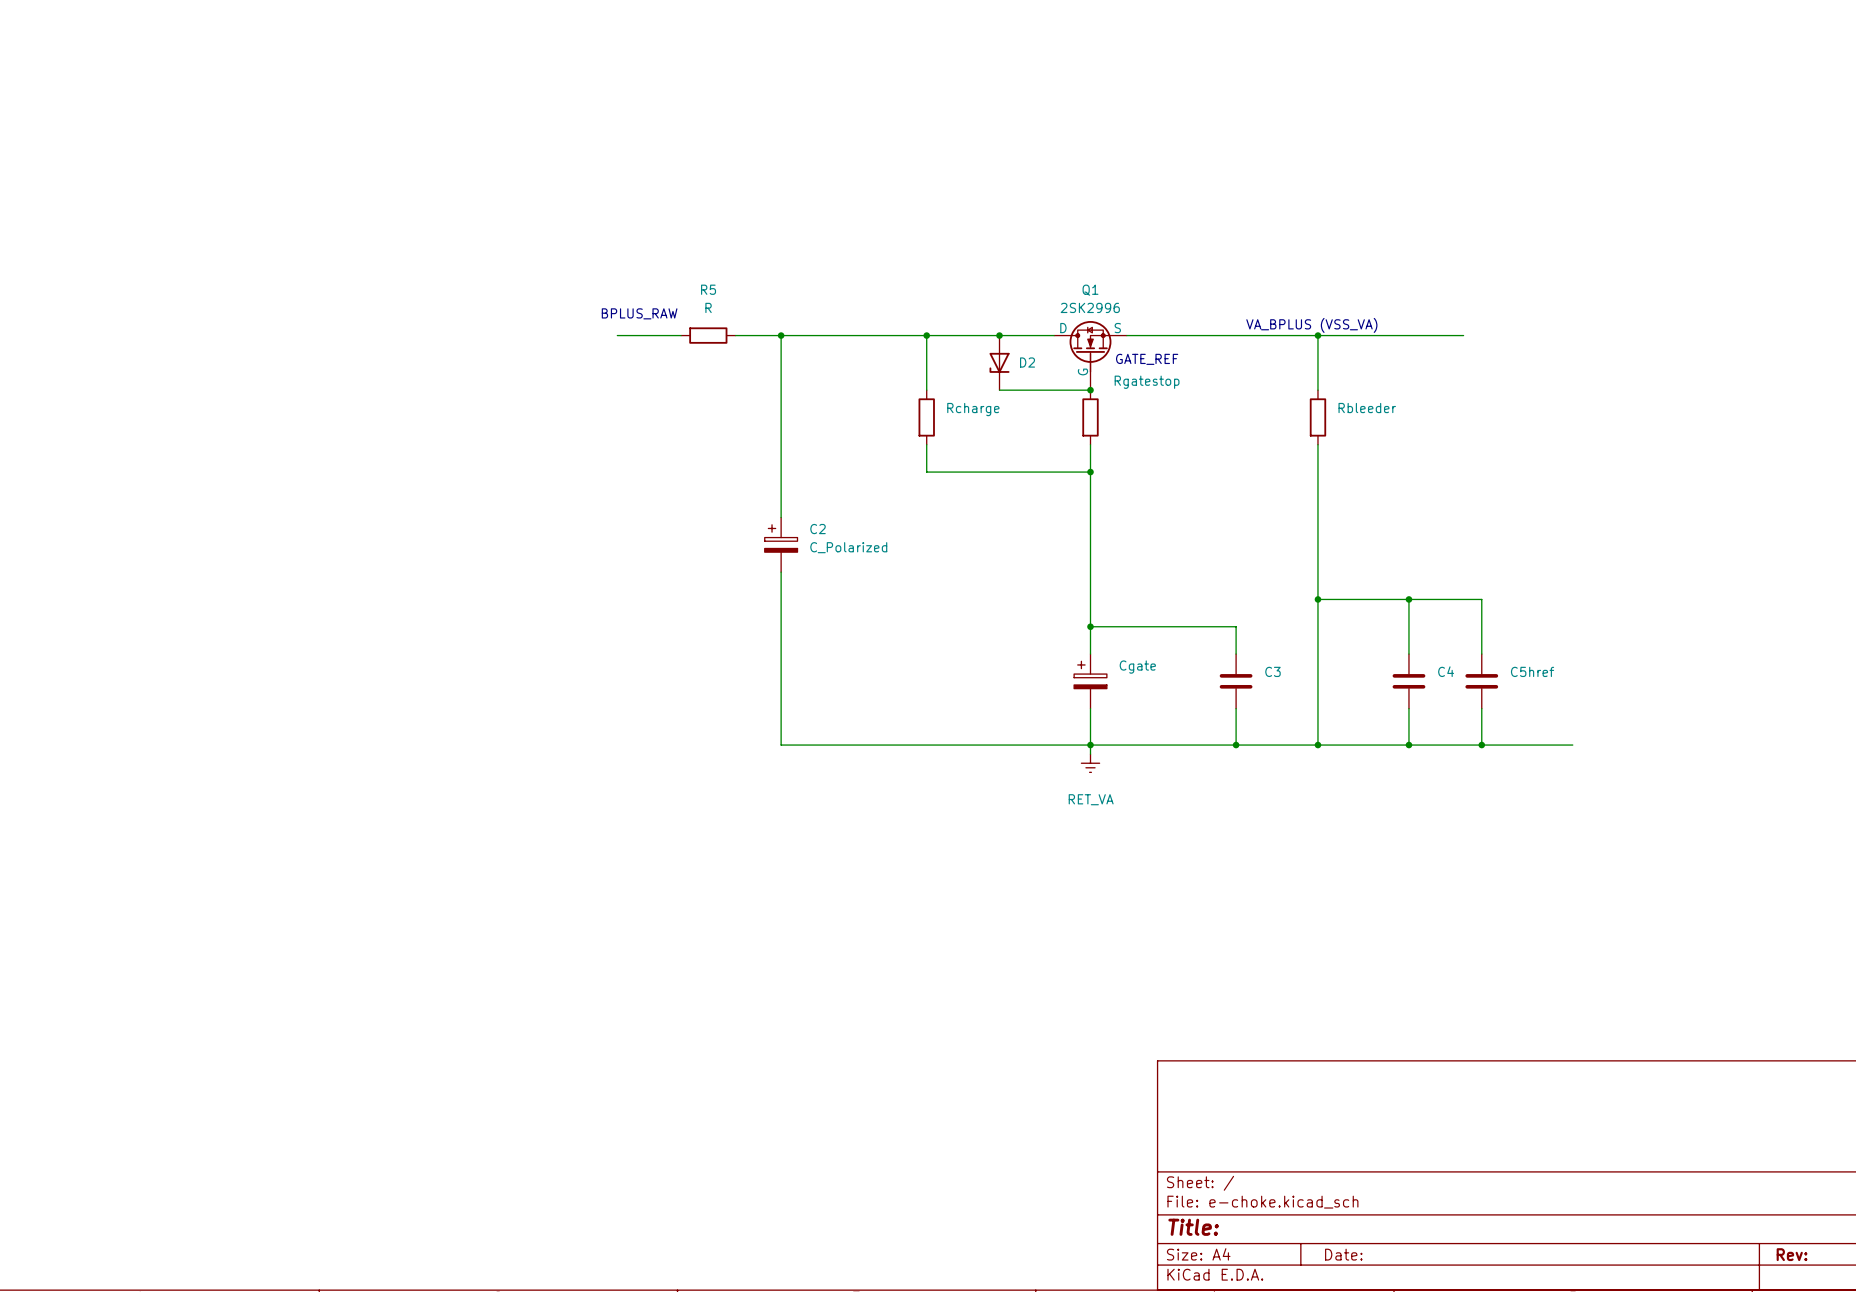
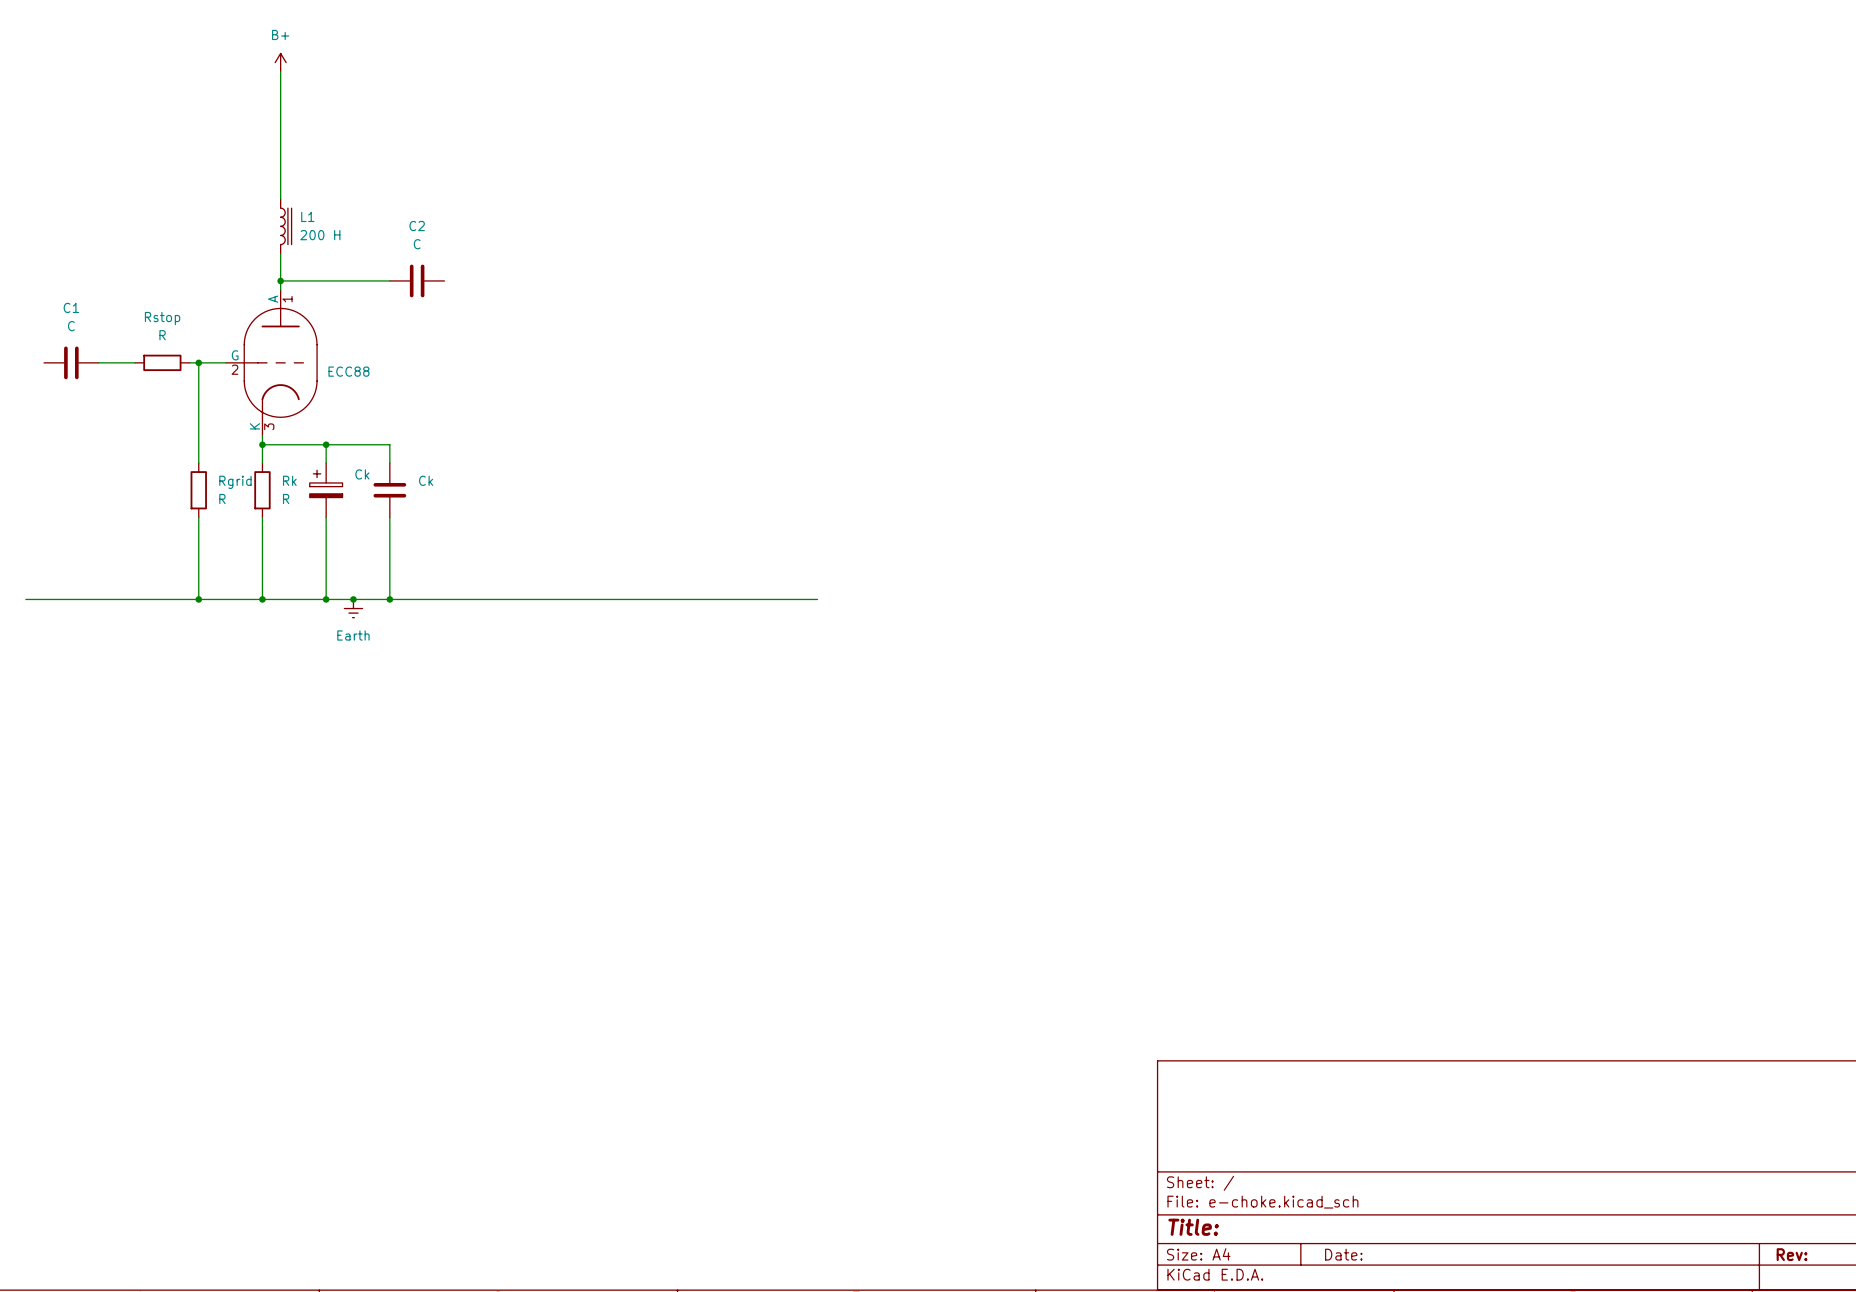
power symbol: none -> B+ (280, 62)
wire: none -> (280, 71) (280, 199)
L1: none -> 200 H (286, 226)
wire: none -> (280, 253) (280, 290)
wire: none -> (280, 280) (389, 280)
junction: none -> (280, 280)
text: BPLUS_RAW (639, 313) -> none
text: VA_BPLUS (VSS_VA) (1311, 325) -> none
wire: (617, 335) (681, 335) -> none
R5: R (708, 335) -> none
wire: (735, 335) (1054, 335) -> none
wire: (781, 335) (781, 517) -> none
junction: (781, 335) -> none
wire: (926, 335) (926, 390) -> none
junction: (926, 335) -> none
junction: (999, 335) -> none
wire: (1126, 335) (1463, 335) -> none
wire: (1317, 335) (1317, 390) -> none
junction: (1317, 335) -> none
Q1: 2SK2996 (1090, 355) -> none
text: GATE_REF (1147, 359) -> none
C1: none -> C (71, 362)
wire: none -> (98, 362) (135, 362)
Rstop: none -> R (162, 362)
wire: none -> (189, 362) (226, 362)
wire: none -> (198, 362) (198, 462)
junction: none -> (198, 362)
part: none -> ECC88 (271, 362)
D2: (999, 362) -> none
wire: (999, 390) (1090, 390) -> none
junction: (1090, 390) -> none
Rcharge: (926, 417) -> none
Rgatestop: (1090, 417) -> none
Rbleeder: (1317, 417) -> none
wire: none -> (262, 435) (262, 462)
wire: none -> (262, 444) (389, 444) (389, 462)
junction: none -> (262, 444)
wire: none -> (326, 444) (326, 462)
junction: none -> (326, 444)
wire: (926, 444) (926, 472) (1090, 472) -> none
wire: (1090, 444) (1090, 654) -> none
wire: (1317, 444) (1317, 745) -> none
junction: (1090, 472) -> none
Rgrid: none -> R (198, 490)
Rk: none -> R (262, 490)
Ck: none -> (326, 490)
Ck: none -> (389, 490)
wire: none -> (198, 517) (198, 599)
wire: none -> (262, 517) (262, 599)
wire: none -> (326, 517) (326, 599)
wire: none -> (389, 517) (389, 599)
C2 symbol: [764, 517, 798, 573] -> [389, 264, 445, 298]
C2 name position: C2 (818, 529) -> C2 (417, 226)
C2 value: C_Polarized (848, 547) -> C (417, 244)
wire: (781, 572) (781, 745) (1572, 745) -> none
wire: none -> (25, 599) (817, 599)
junction: none -> (198, 599)
junction: none -> (262, 599)
junction: none -> (326, 599)
junction: none -> (353, 599)
junction: none -> (389, 599)
wire: (1317, 599) (1481, 599) (1481, 654) -> none
junction: (1317, 599) -> none
wire: (1408, 599) (1408, 654) -> none
junction: (1408, 599) -> none
power symbol: none -> Earth (353, 608)
wire: (1090, 626) (1236, 626) (1236, 654) -> none
junction: (1090, 626) -> none
Cgate: (1090, 681) -> none
C3: (1236, 681) -> none
C4: (1408, 681) -> none
C5href: (1481, 681) -> none
wire: (1090, 708) (1090, 754) -> none
wire: (1236, 708) (1236, 745) -> none
wire: (1408, 708) (1408, 745) -> none
wire: (1481, 708) (1481, 745) -> none
junction: (1090, 745) -> none
junction: (1236, 745) -> none
junction: (1317, 745) -> none
junction: (1408, 745) -> none
junction: (1481, 745) -> none
RET_VA: (1090, 763) -> none

